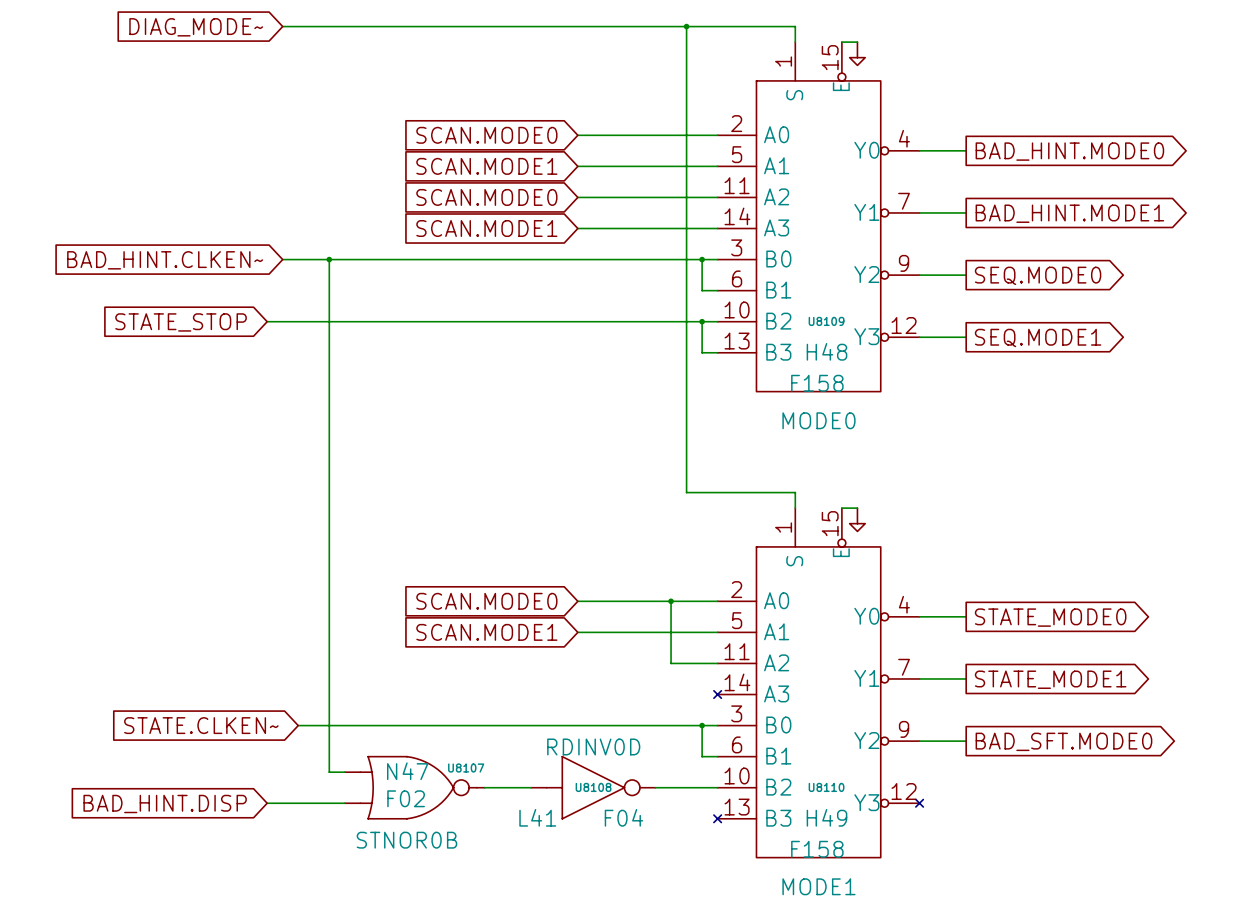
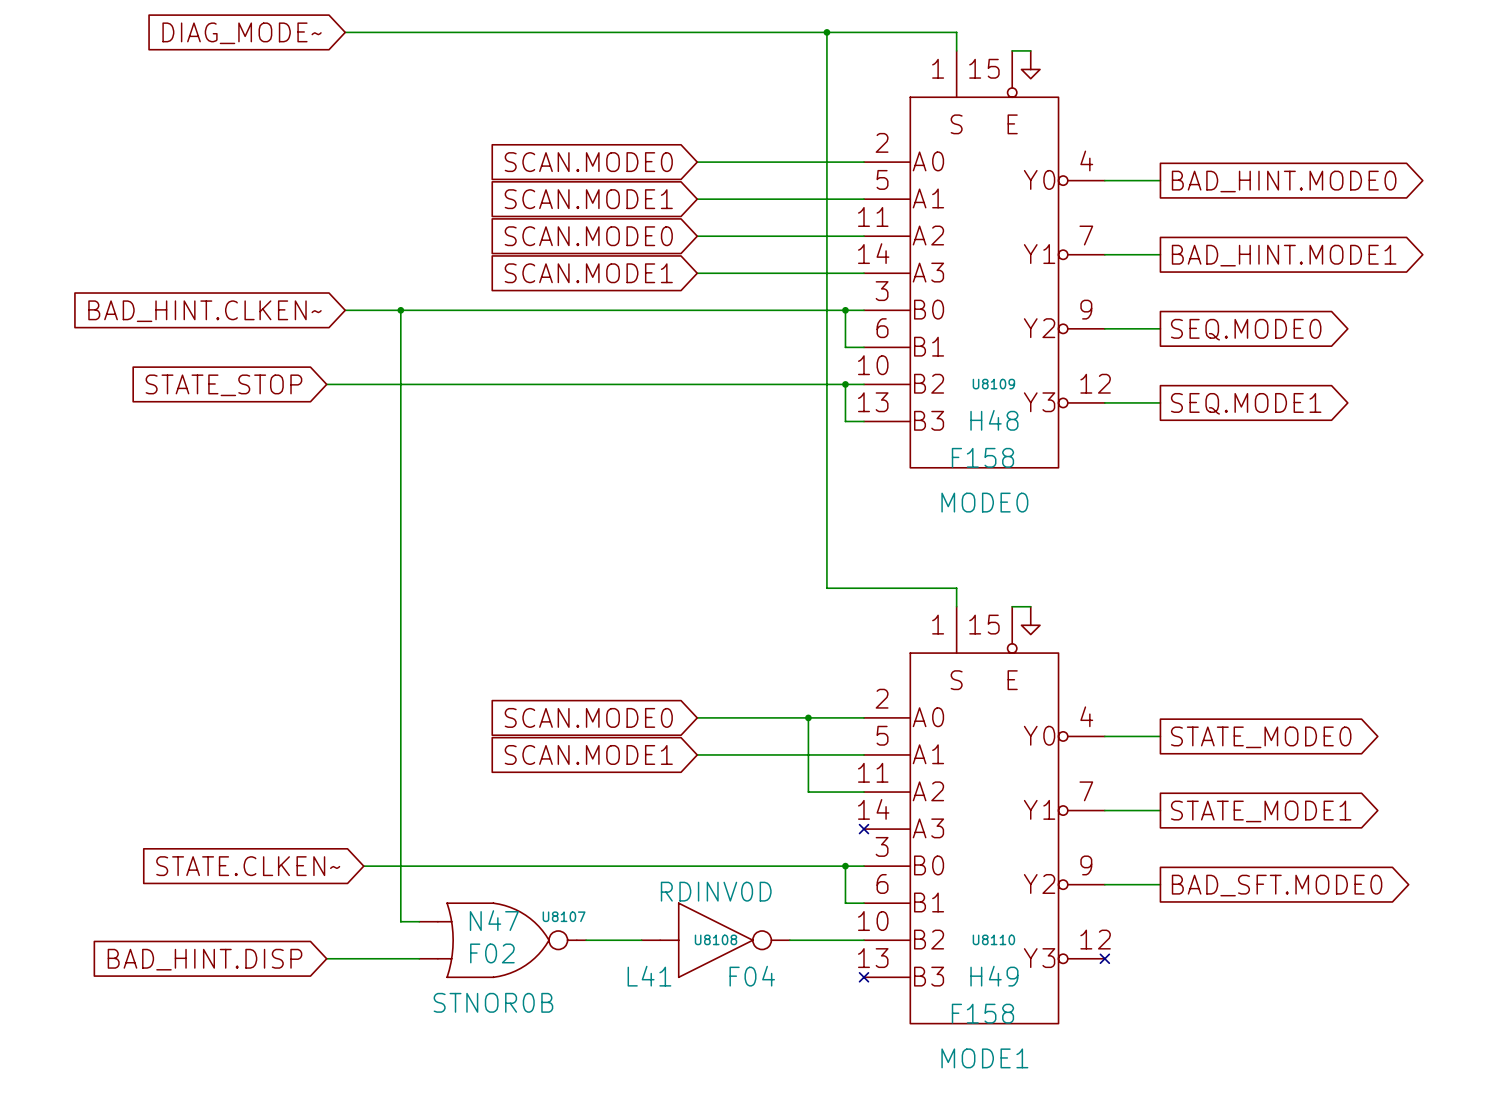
U8109 symbol: [717, 42, 920, 392] -> [864, 50, 1105, 468]
U8110 symbol: [717, 508, 920, 858] -> [864, 606, 1105, 1024]

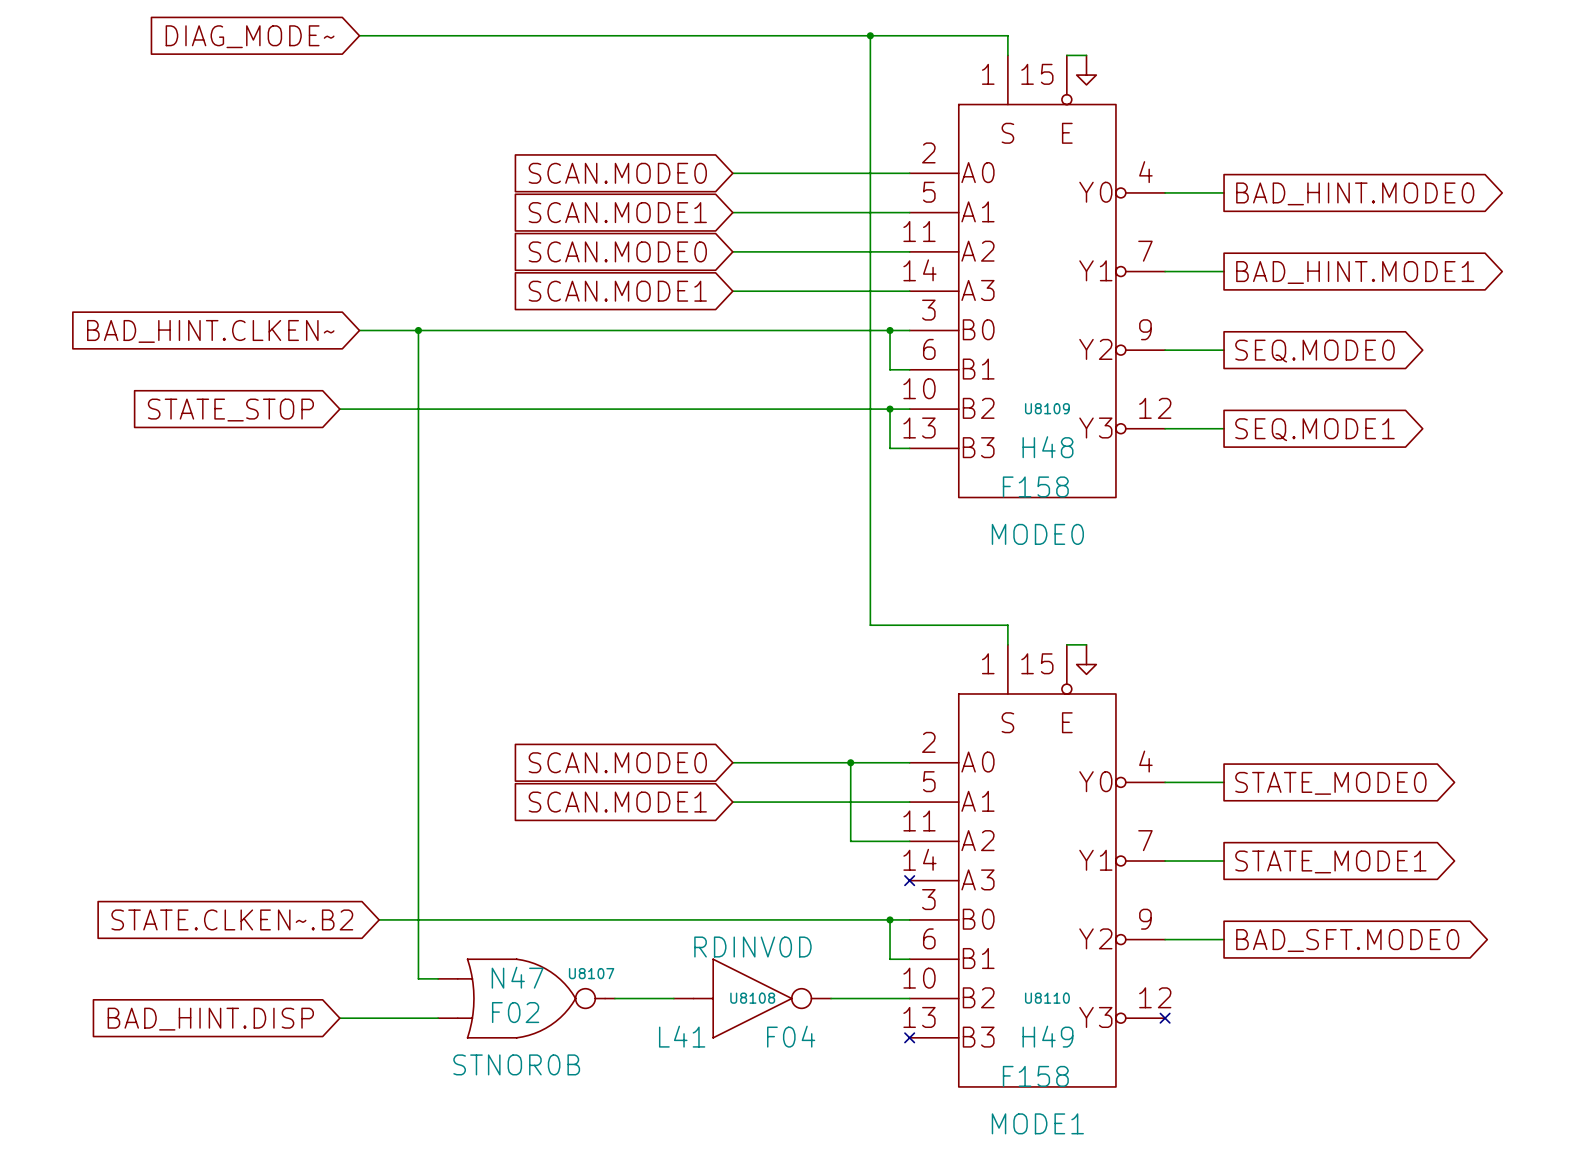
global label: STATE.CLKEN~ (248, 866) -> STATE.CLKEN~.B2 (232, 919)

